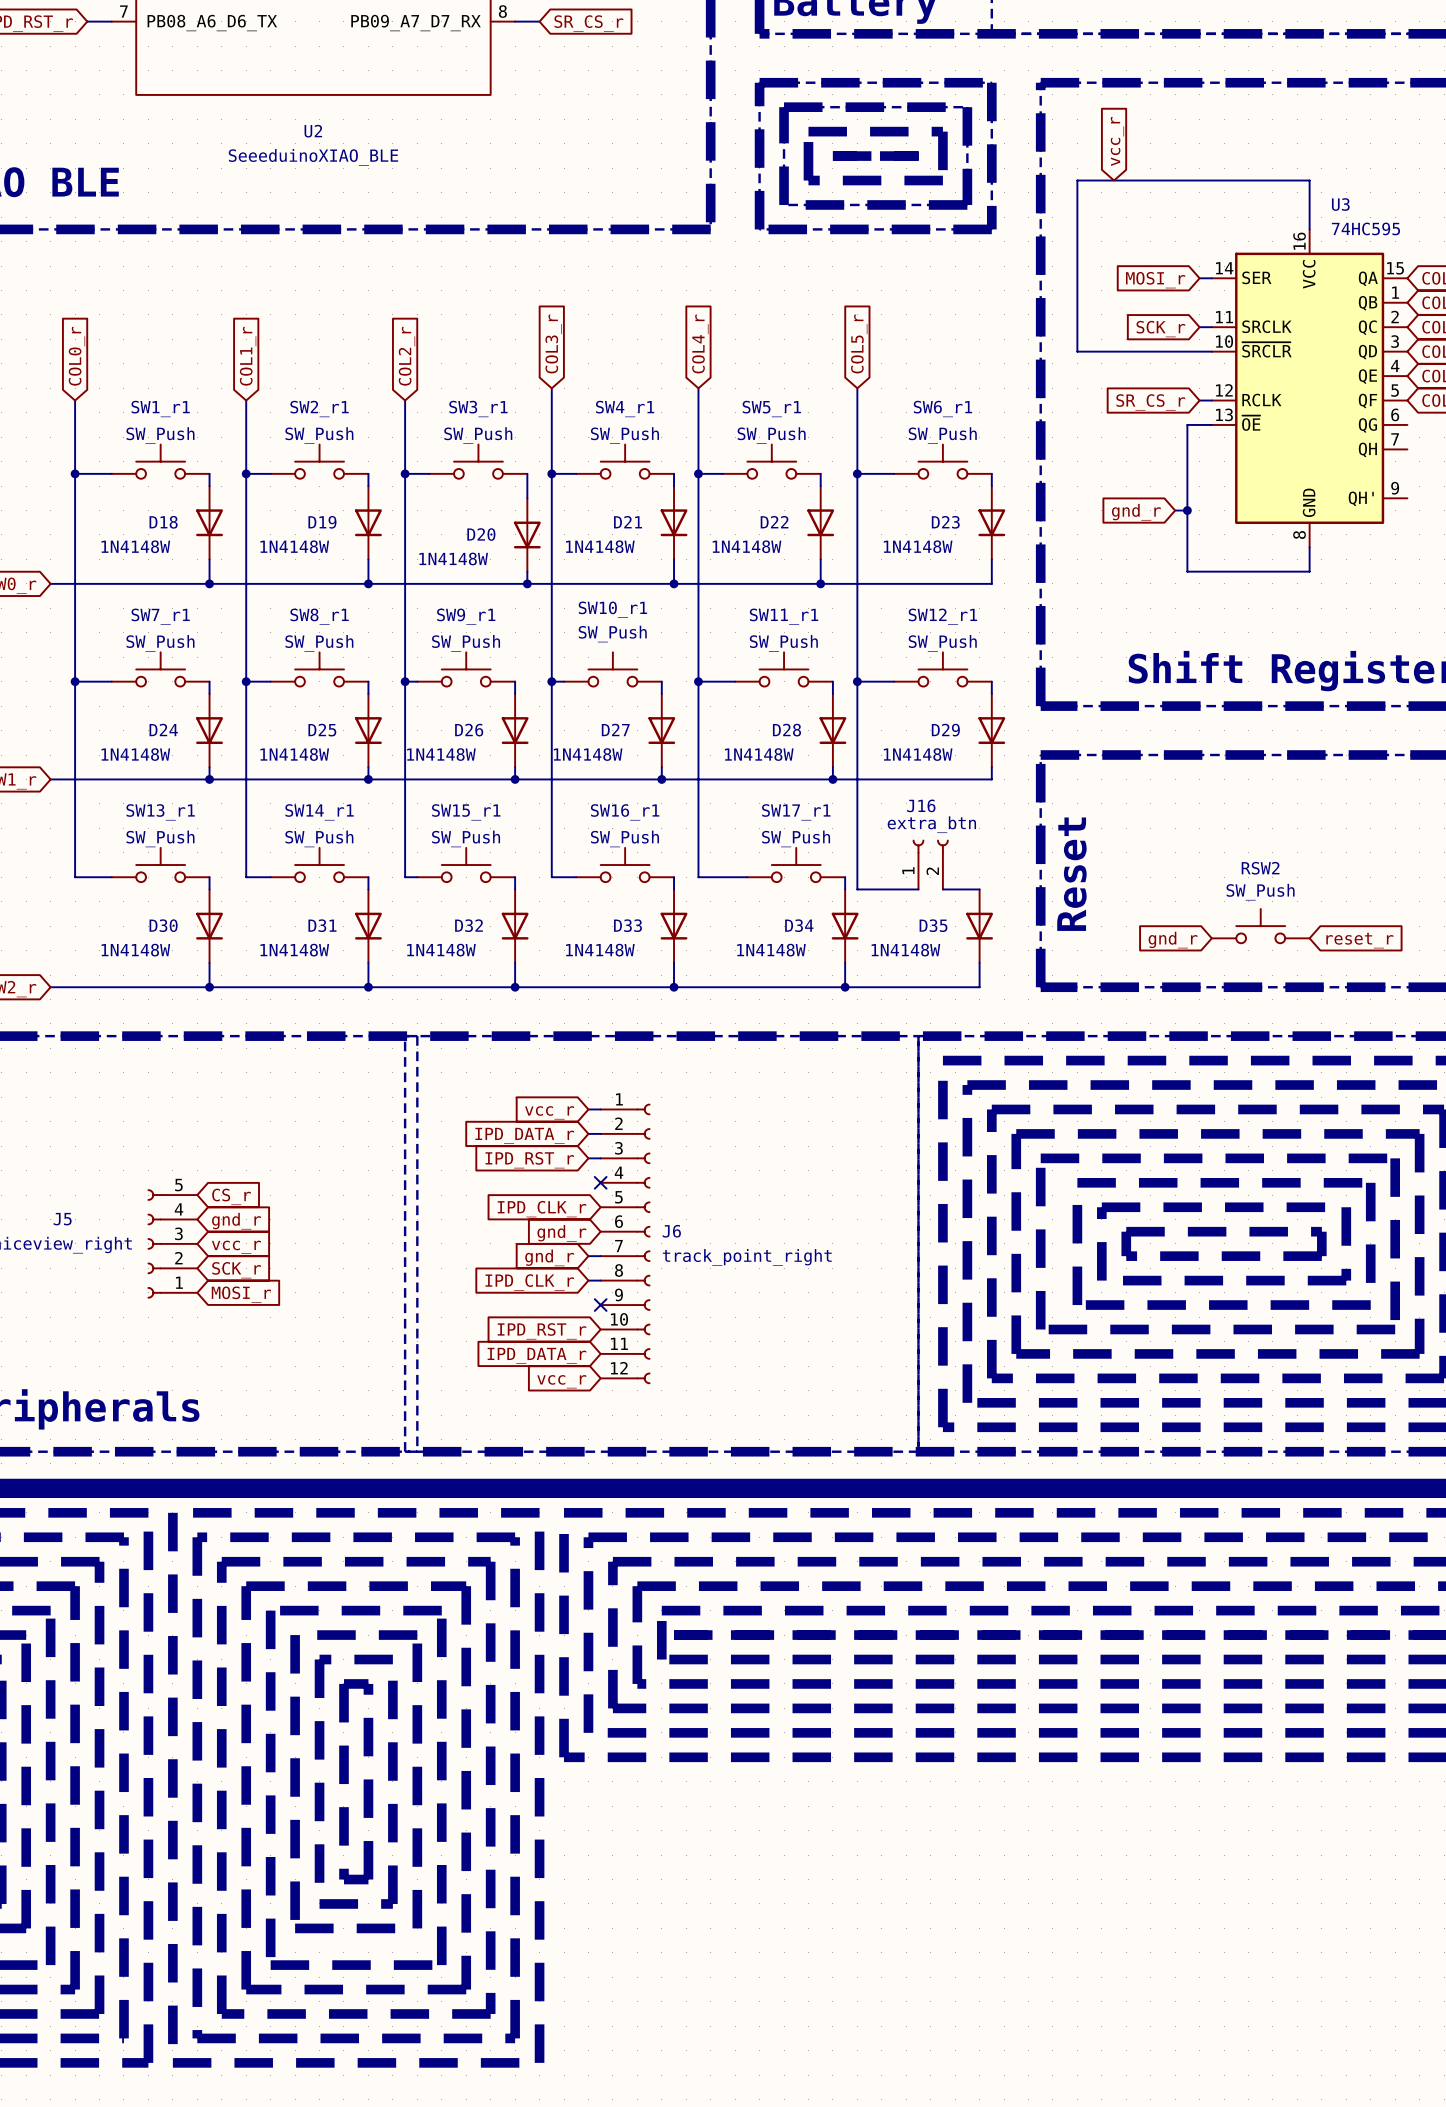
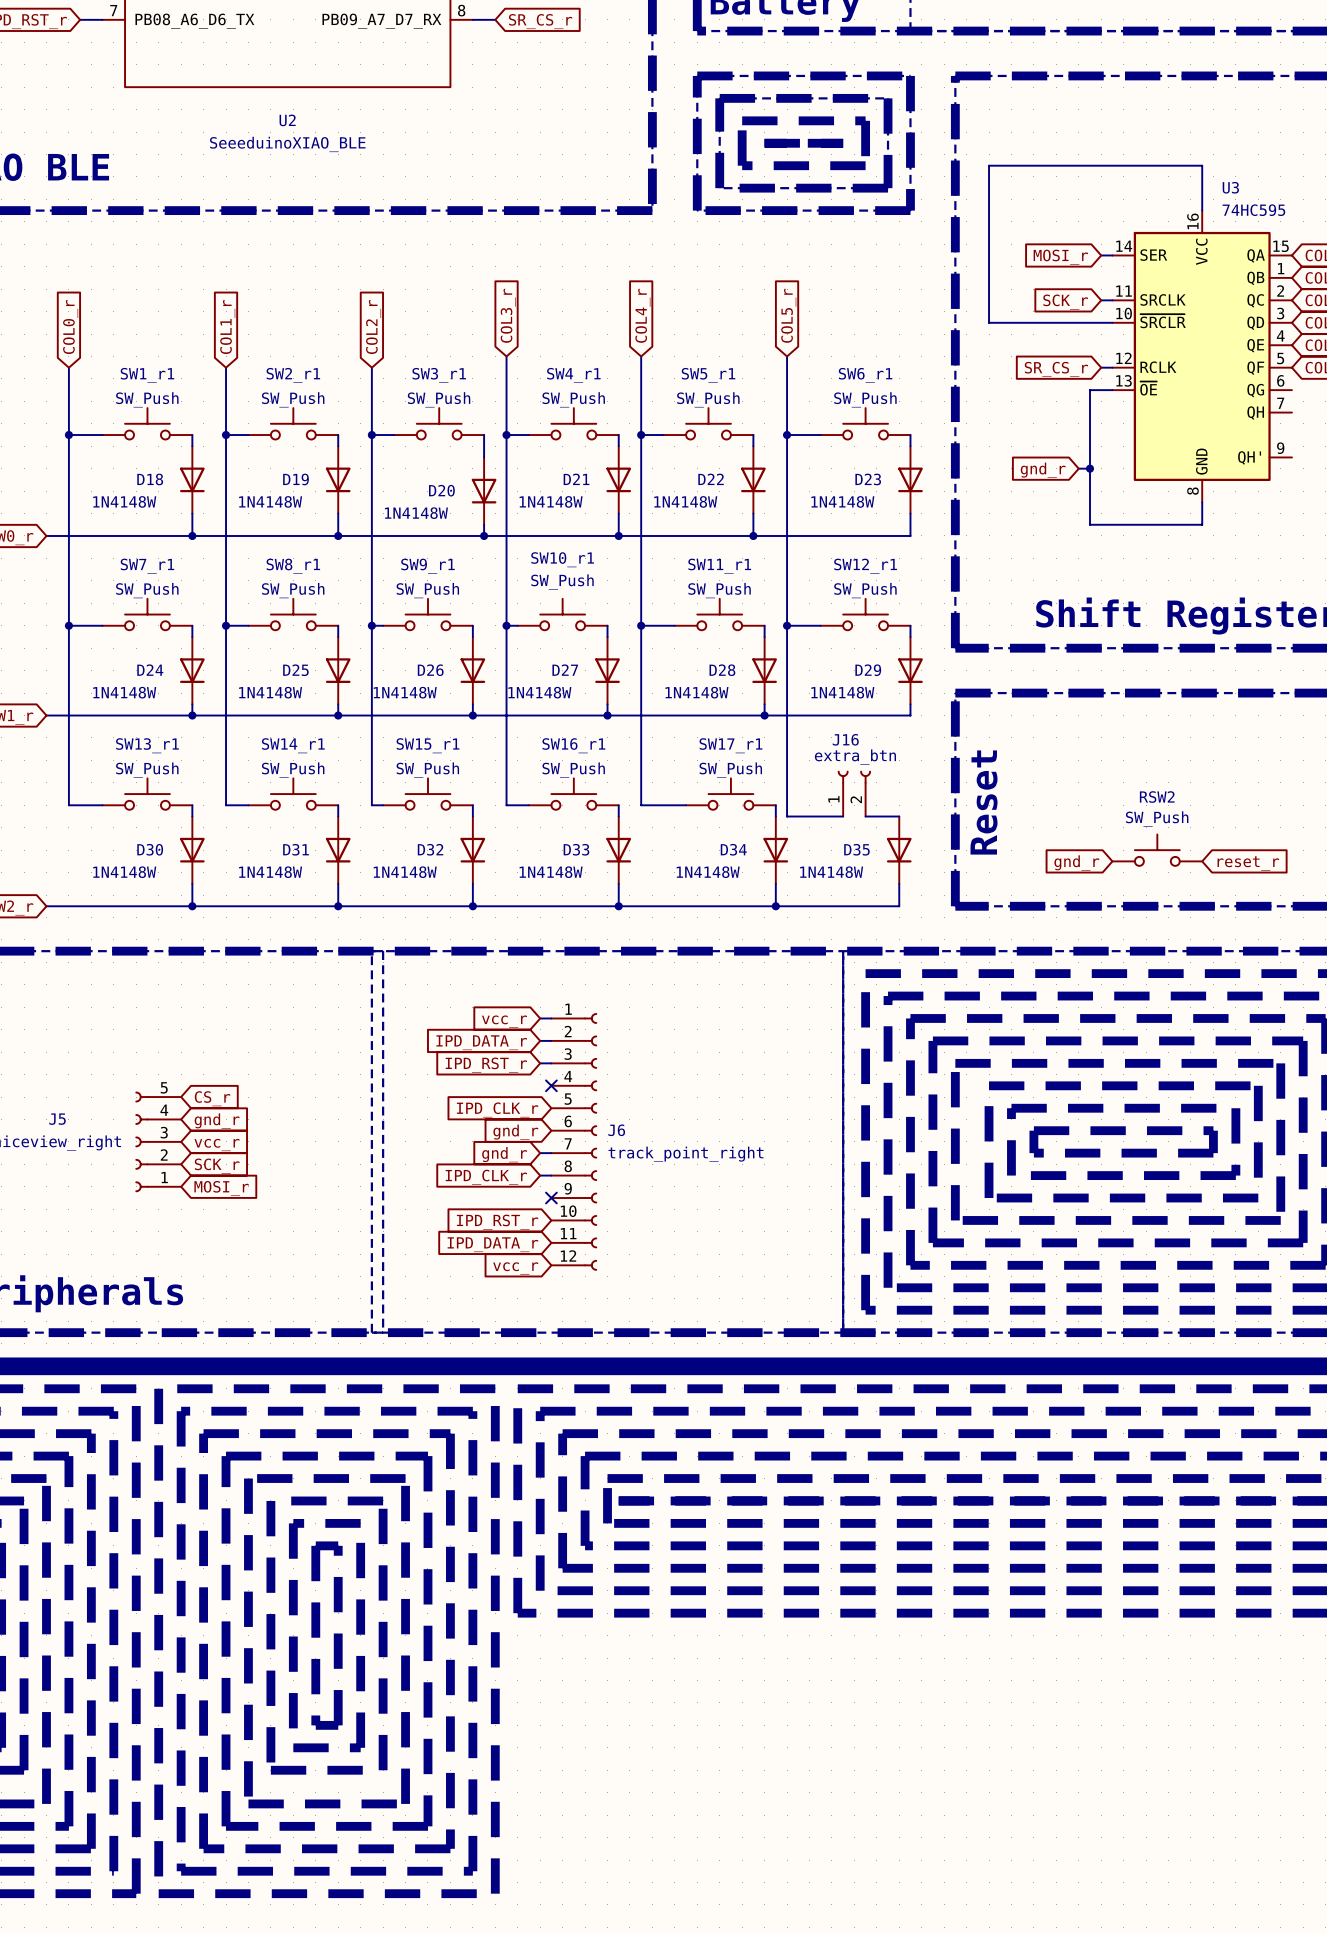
global label: vcc_r (1117, 141) -> none

